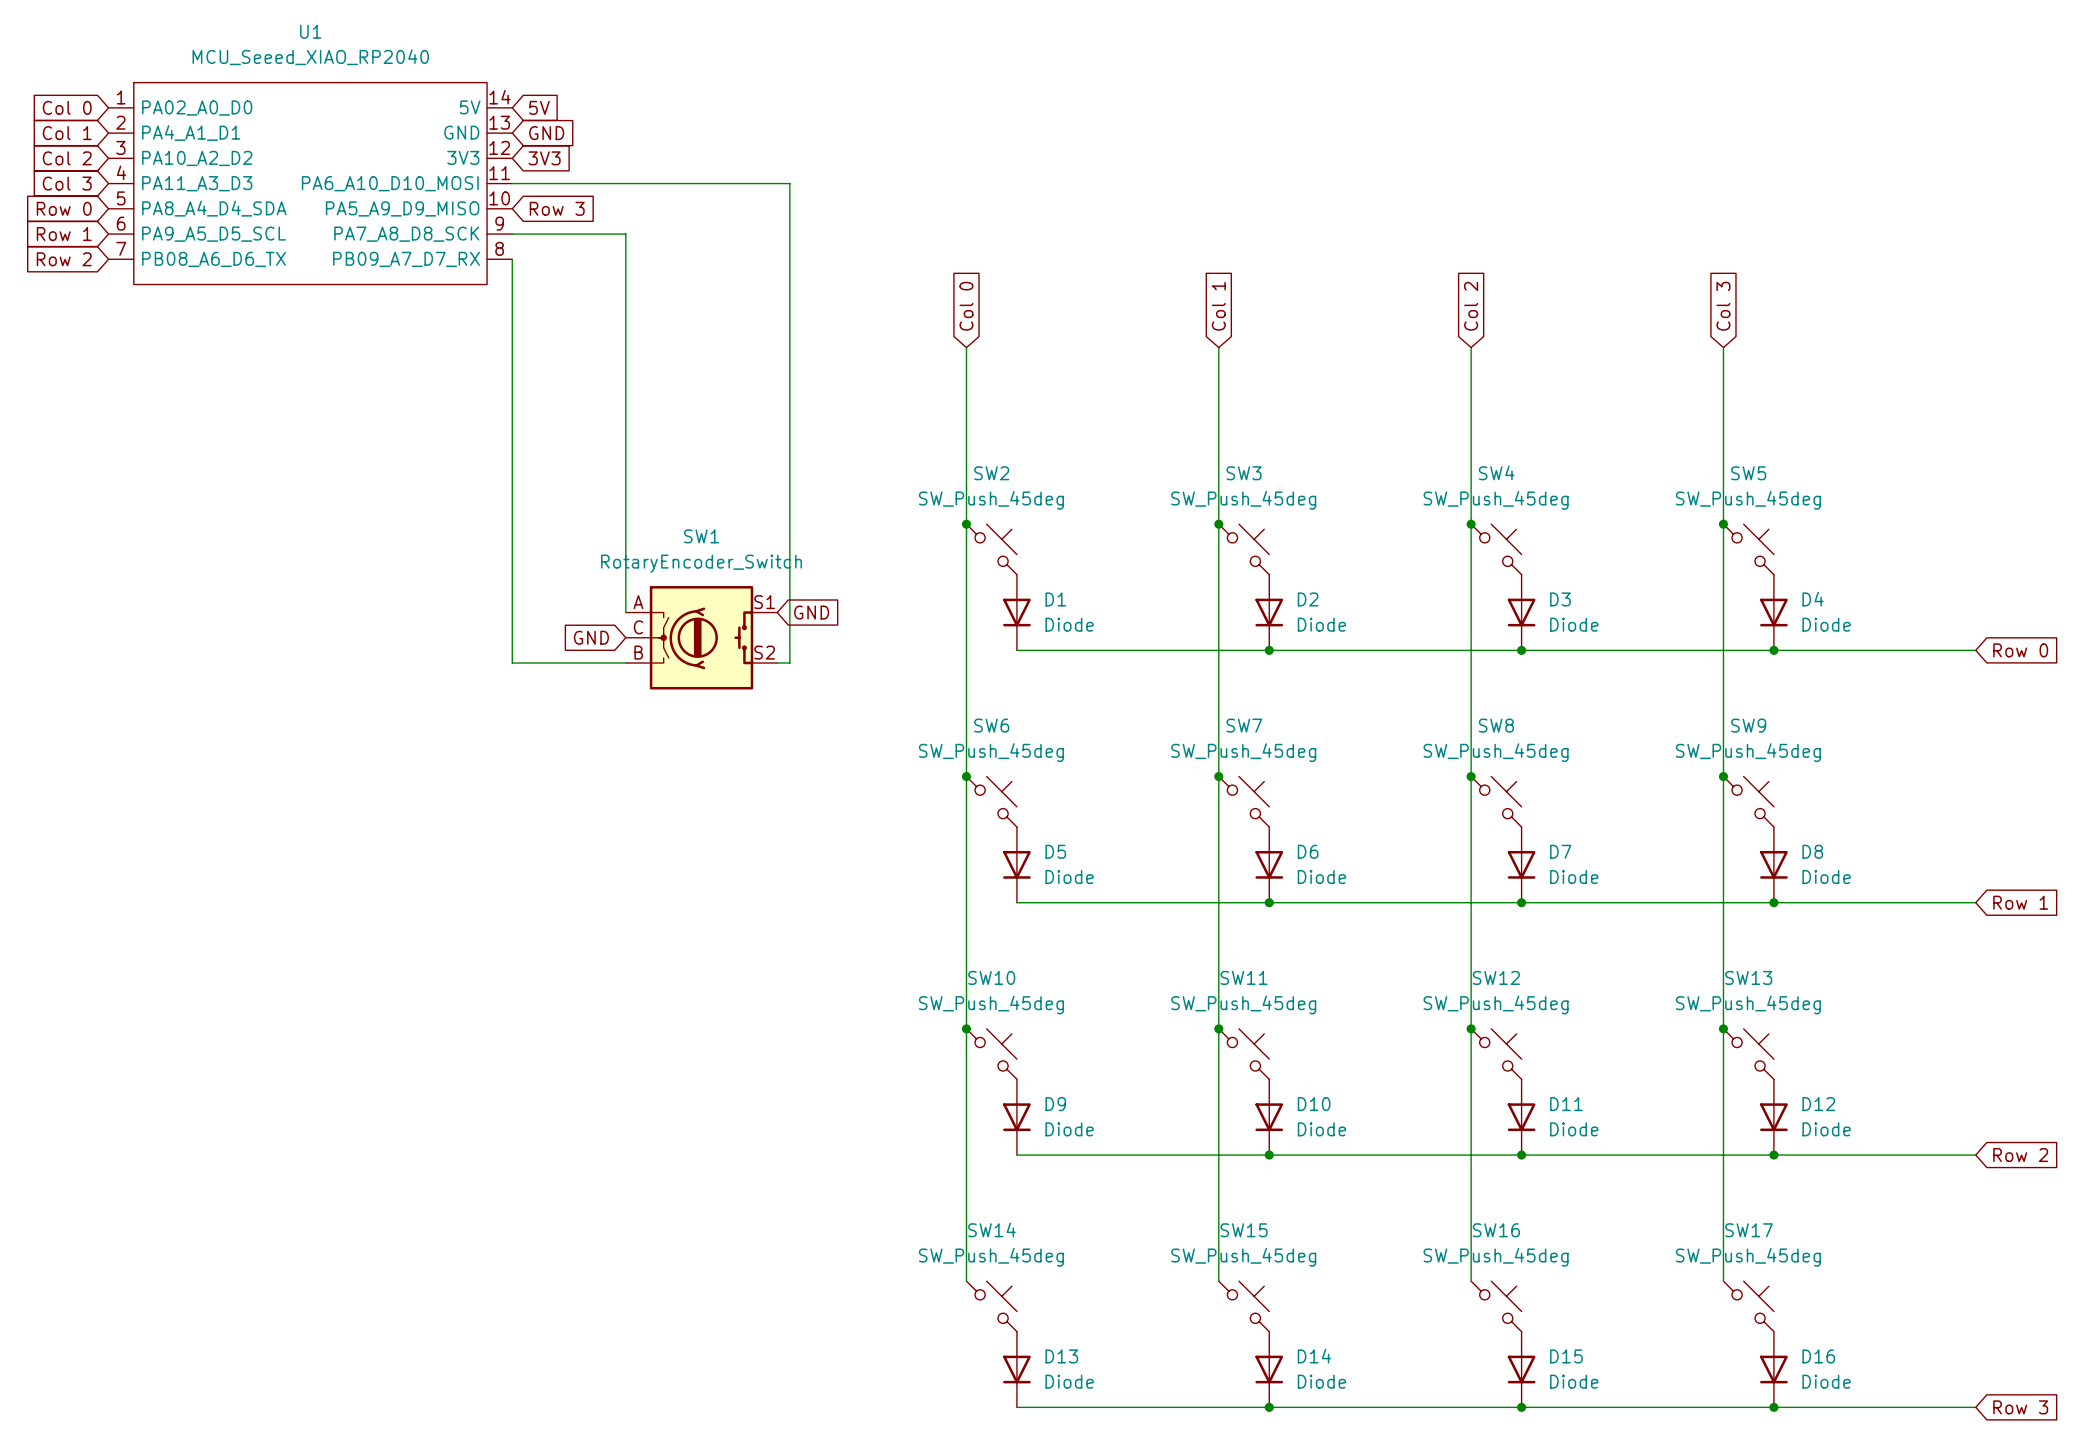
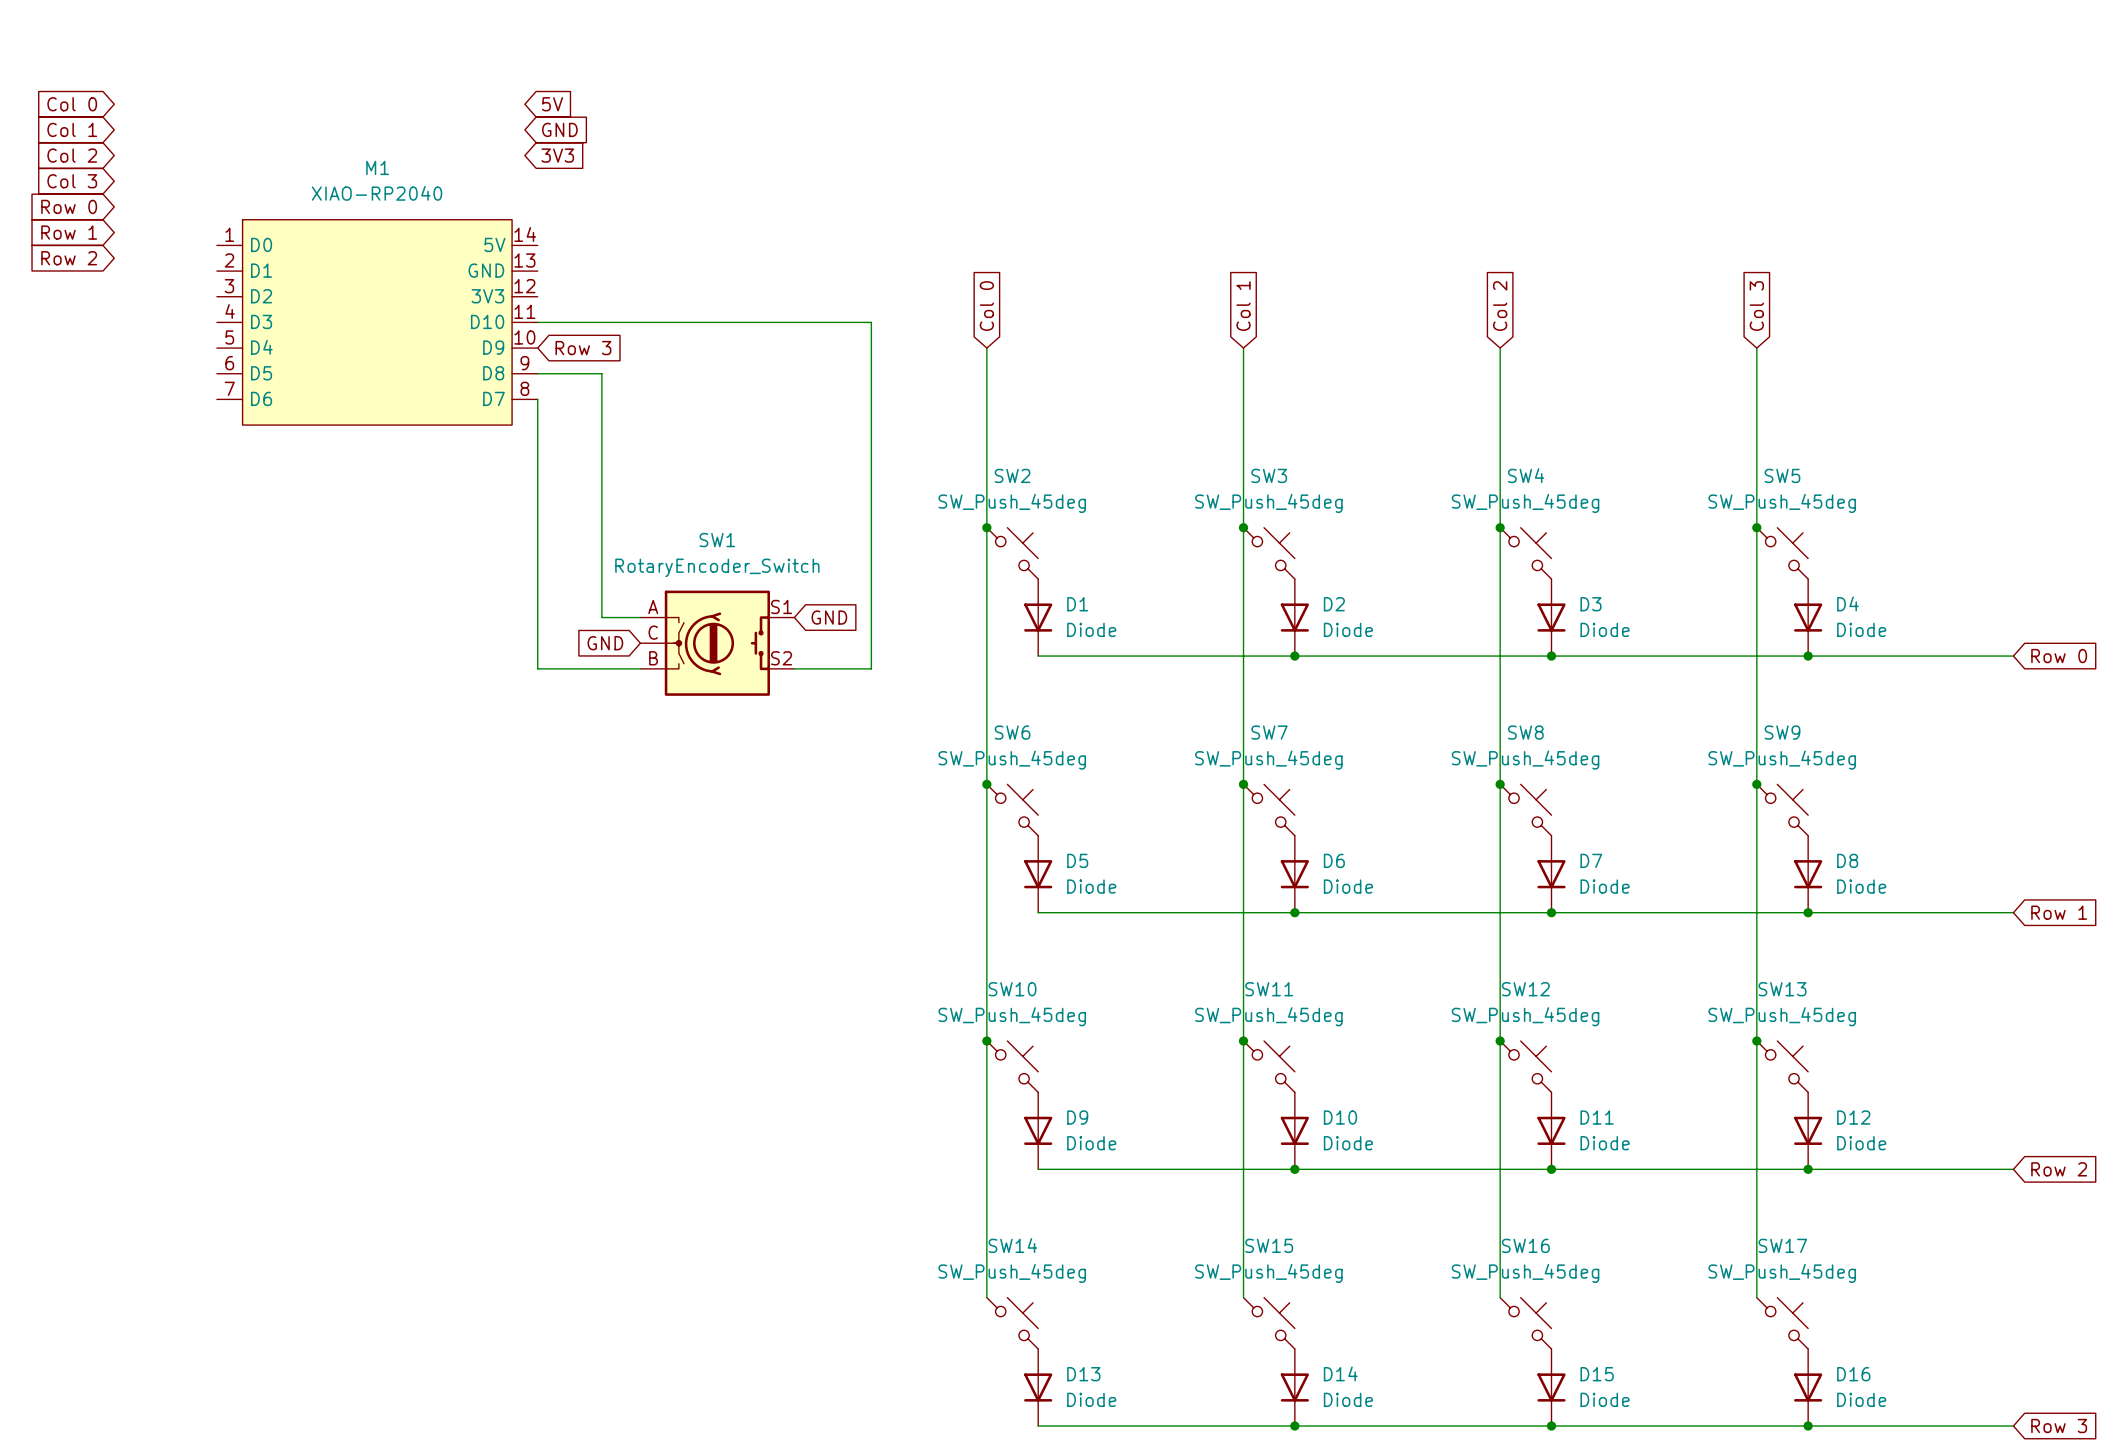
U1: MCU_Seeed_XIAO_RP2040 (310, 183) -> none
wire: (512, 183) (789, 183) (789, 662) -> (537, 322) (871, 322) (871, 668) (807, 668)
global label position: Row 3 (557, 208) -> Row 3 (583, 348)
wire: (512, 234) (625, 234) (625, 612) -> (537, 373) (601, 373) (601, 617) (640, 617)
wire: (512, 259) (512, 662) (524, 662) -> (537, 399) (537, 668)
M1: none -> XIAO-RP2040 (377, 322)

